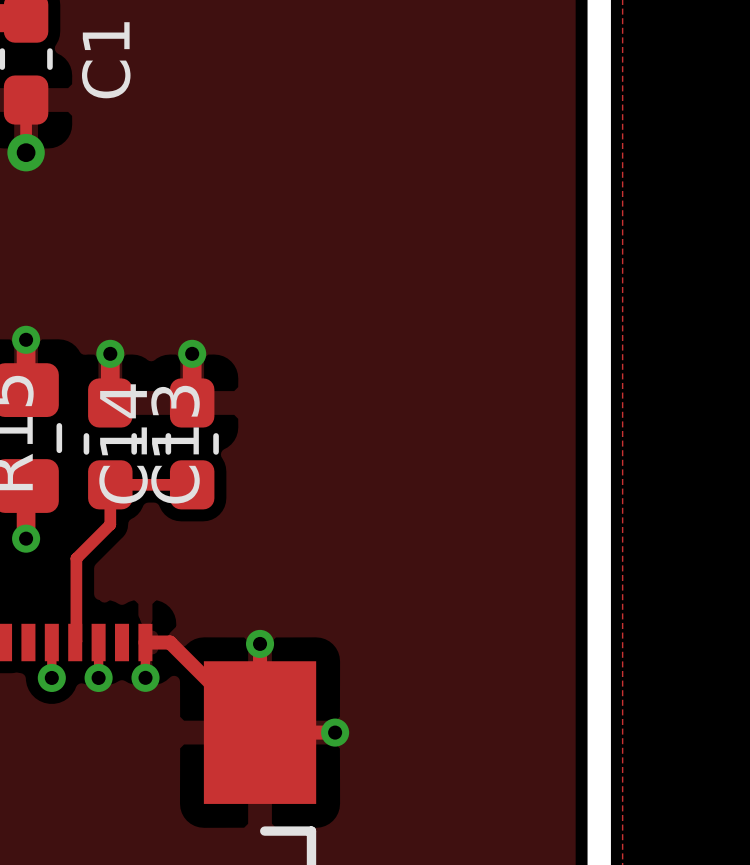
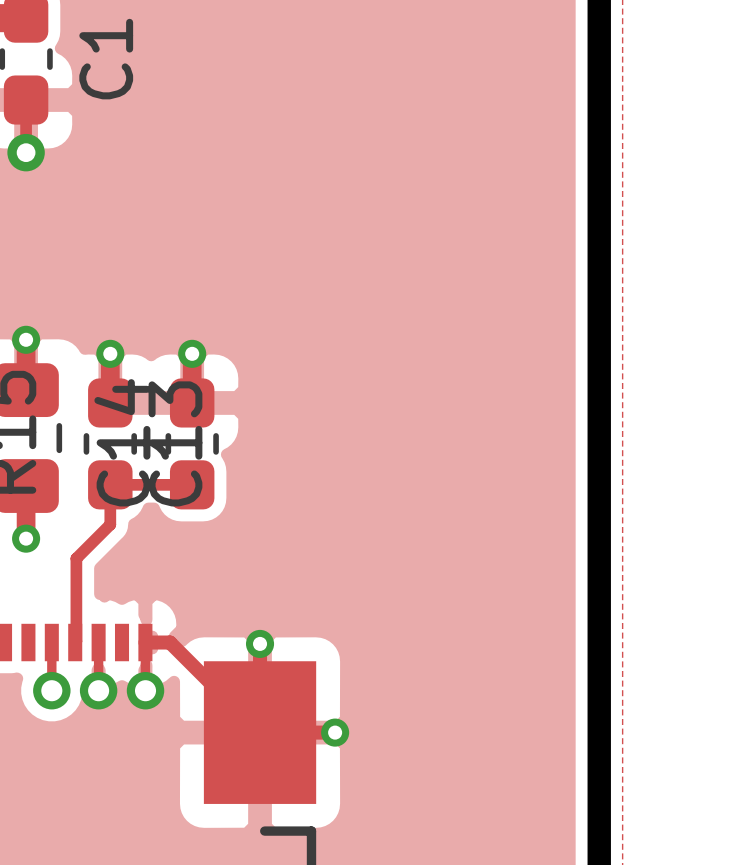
via size: [37, 663, 66, 692] -> [33, 672, 71, 710]
via size: [84, 663, 113, 692] -> [79, 672, 118, 710]
via size: [131, 663, 160, 692] -> [126, 672, 165, 710]

